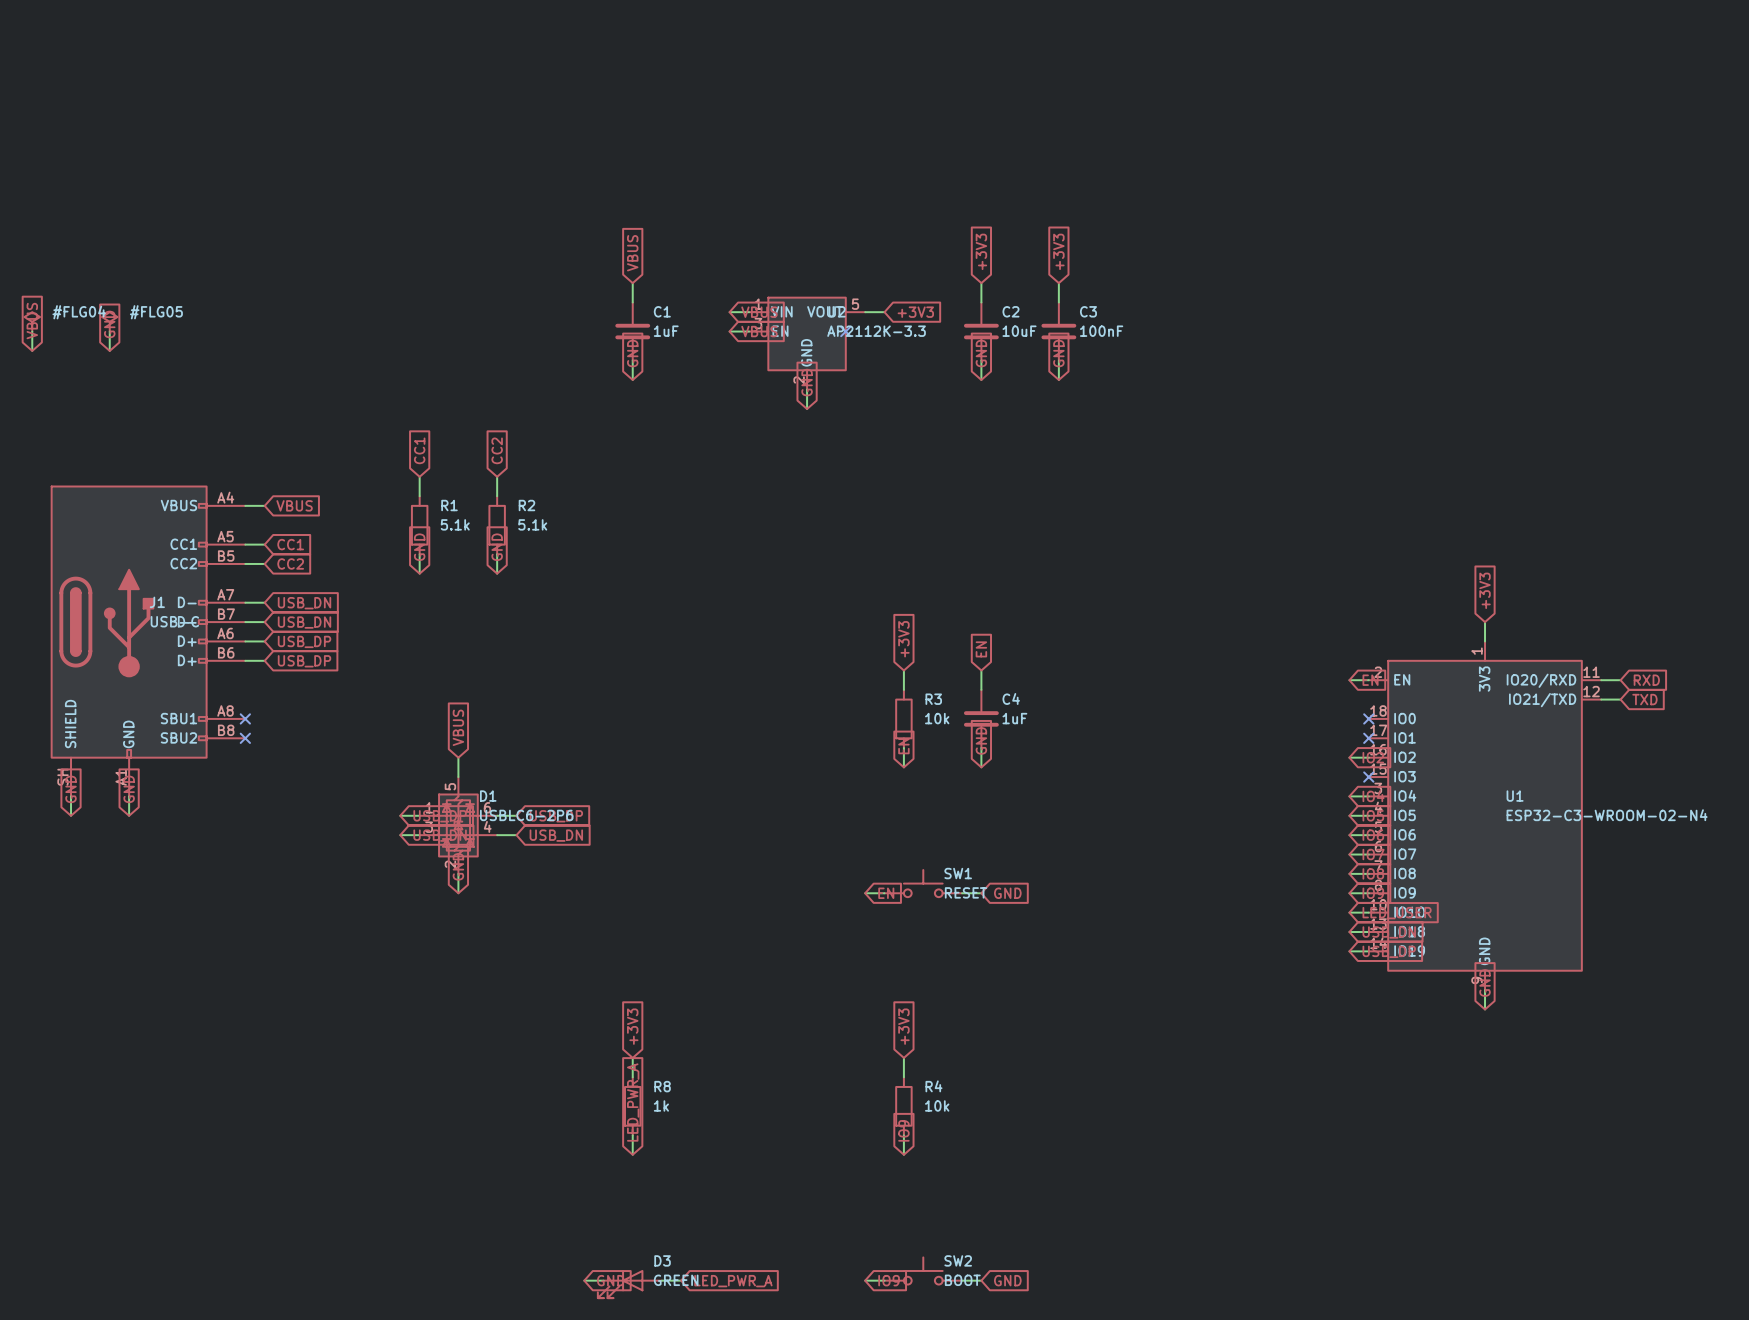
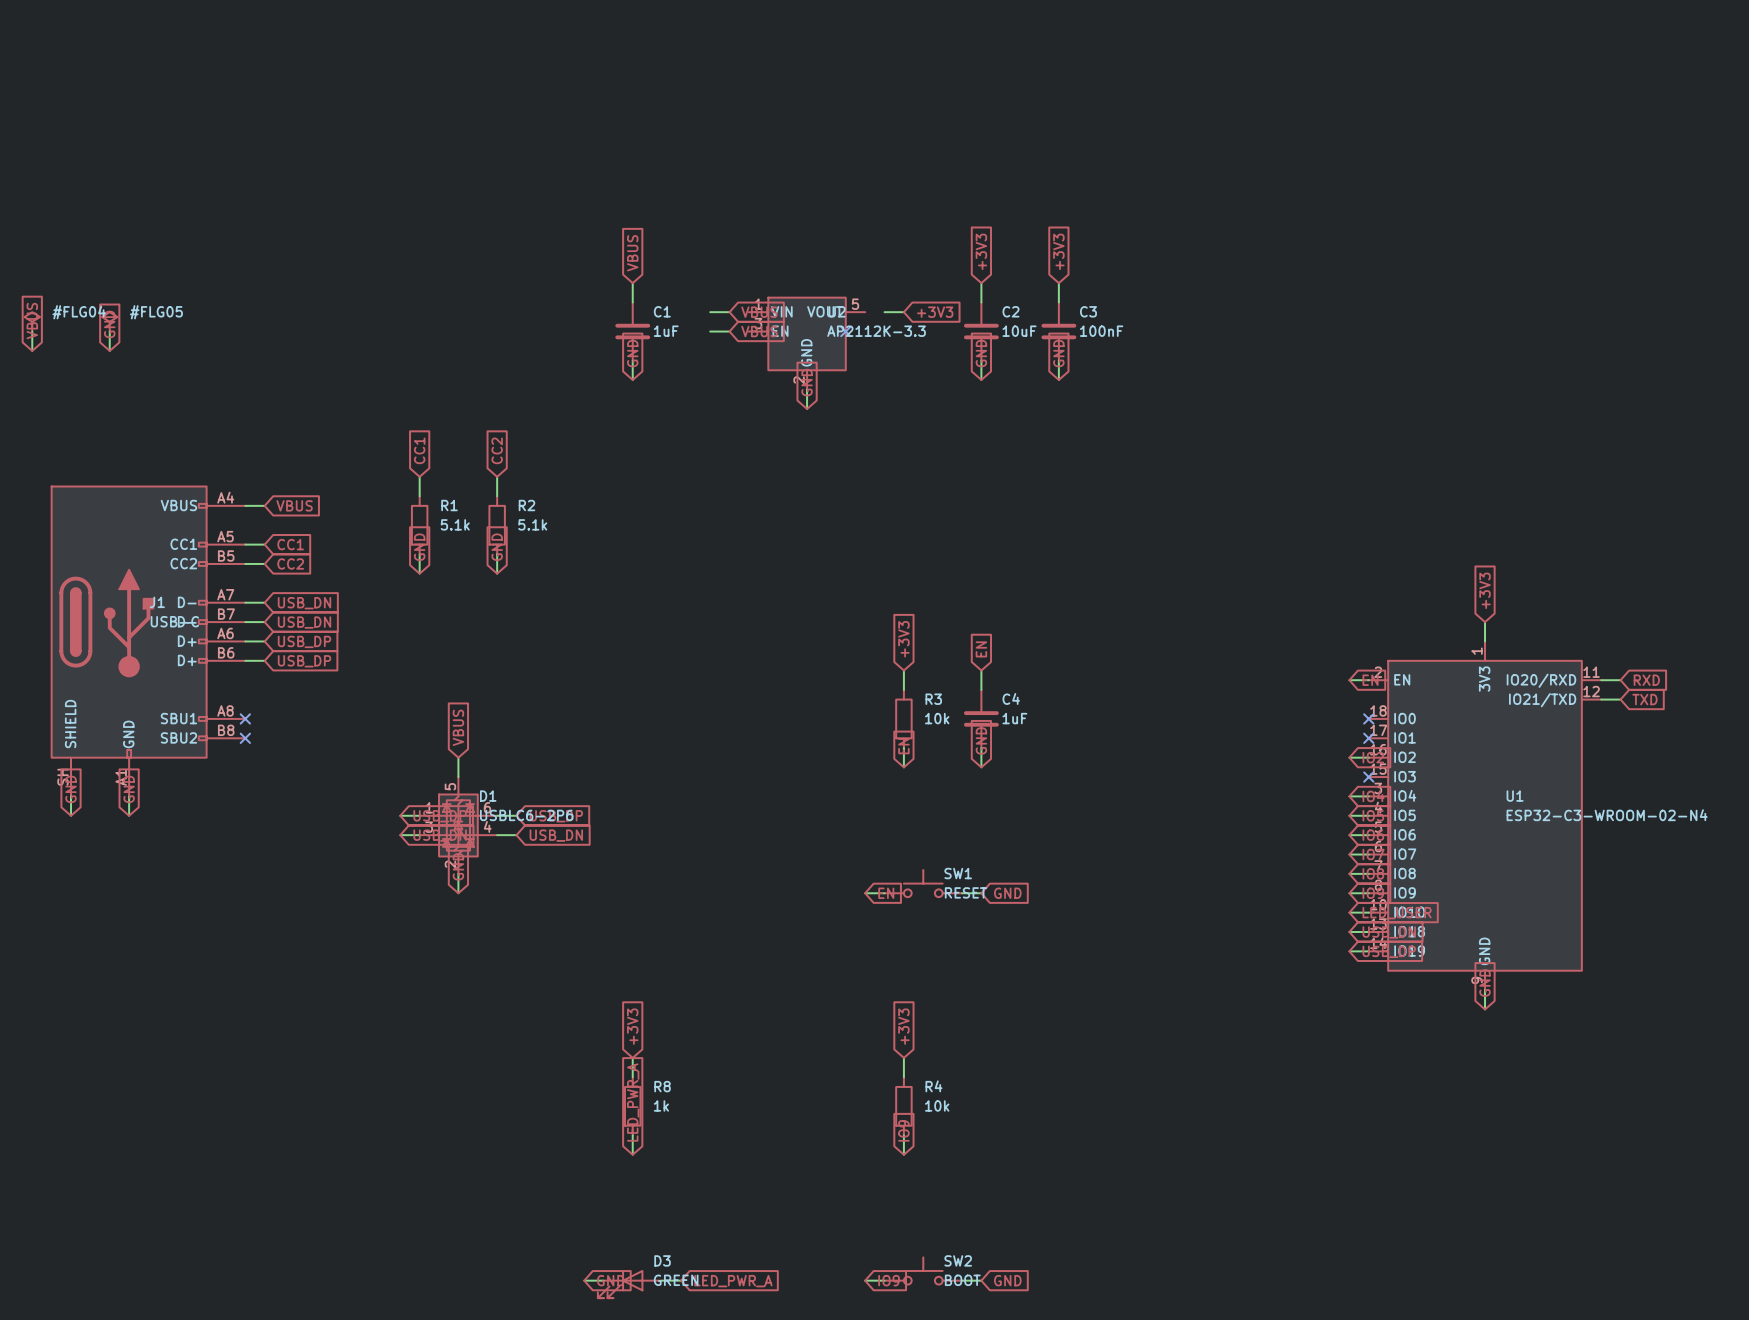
wire: (729, 312) (748, 312) -> (729, 312) (710, 312)
wire: (865, 312) (884, 312) -> (903, 312) (884, 312)
global label position: +3V3 (915, 312) -> +3V3 (935, 312)
wire: (729, 331) (748, 331) -> (729, 331) (710, 331)

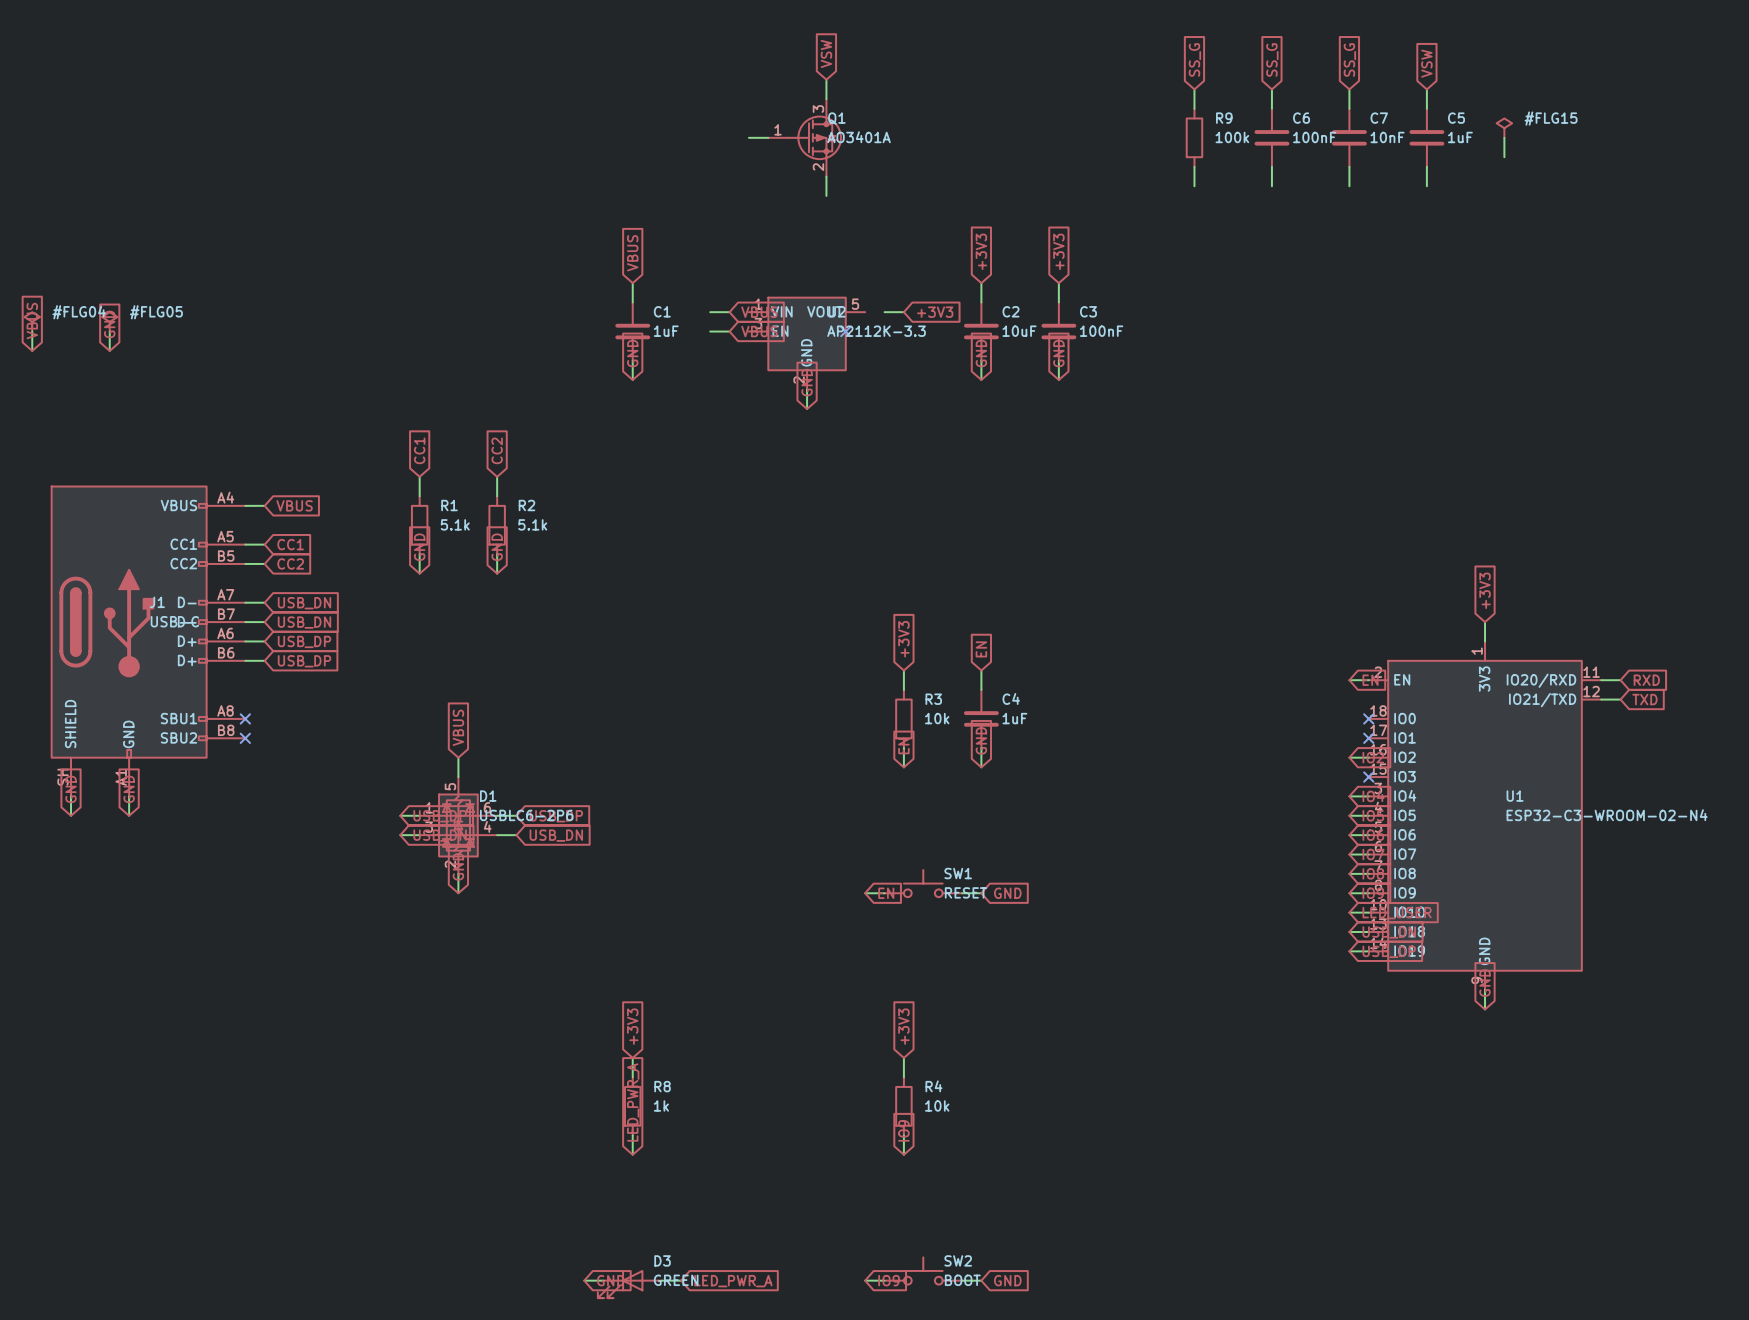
global label: none -> VSW (826, 54)
global label: none -> SS_G (1194, 60)
global label: none -> SS_G (1272, 60)
global label: none -> SS_G (1349, 60)
global label: none -> VSW (1426, 63)
wire: none -> (826, 79) (826, 99)
wire: none -> (1194, 89) (1194, 108)
wire: none -> (1271, 89) (1271, 108)
wire: none -> (1349, 89) (1349, 108)
wire: none -> (1426, 89) (1426, 108)
#FLG15: none -> (1504, 128)
wire: none -> (748, 137) (768, 137)
Q1: none -> AO3401A (805, 137)
R9: none -> 100k (1194, 137)
C6: none -> 100nF (1271, 137)
C7: none -> 10nF (1349, 137)
C5: none -> 1uF (1426, 137)
wire: none -> (1504, 137) (1504, 157)
wire: none -> (1194, 166) (1194, 186)
wire: none -> (1271, 166) (1271, 186)
wire: none -> (1349, 166) (1349, 186)
wire: none -> (1426, 166) (1426, 186)
wire: none -> (826, 176) (826, 195)

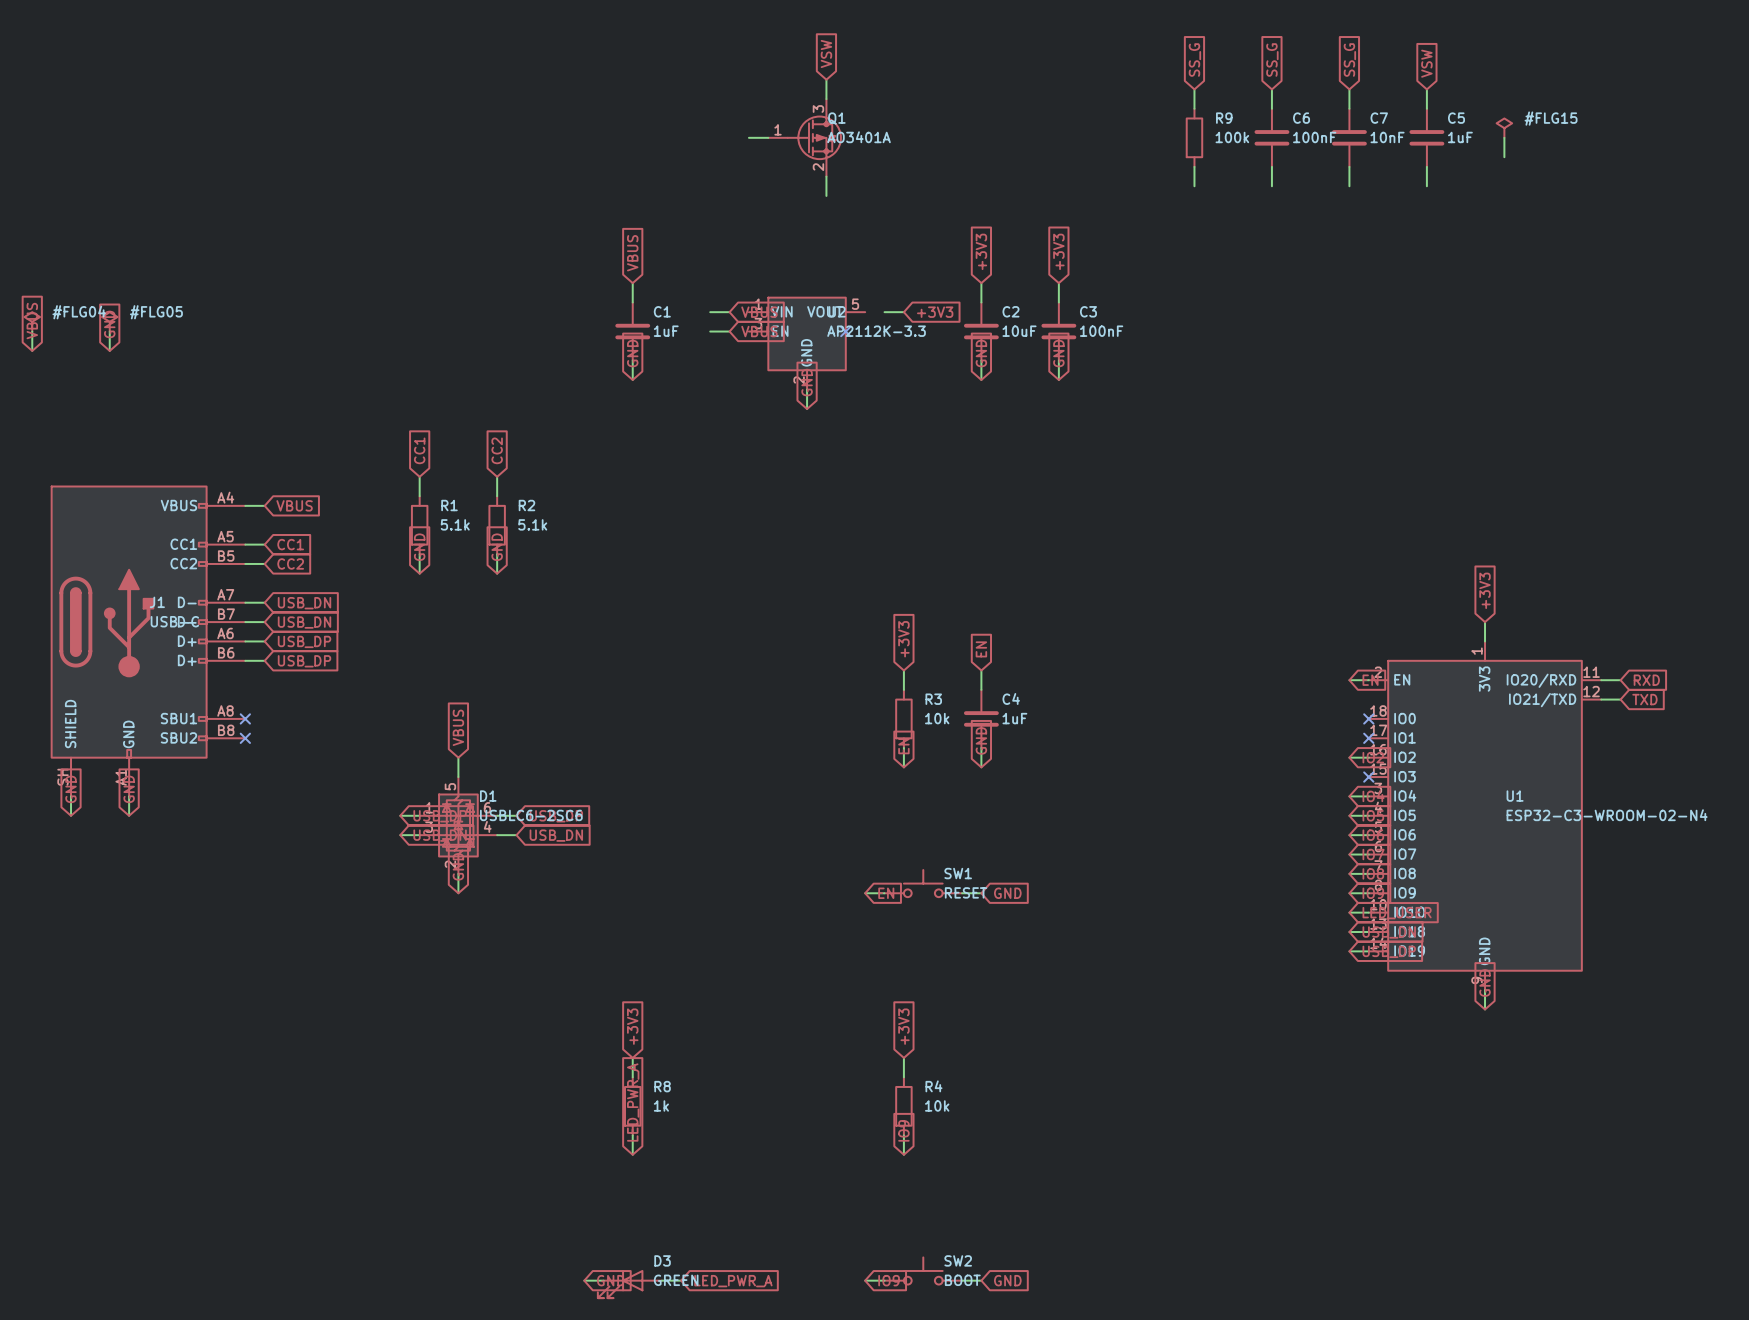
D1 value: USBLC6-2P6 (526, 815) -> USBLC6-2SC6 (531, 815)

